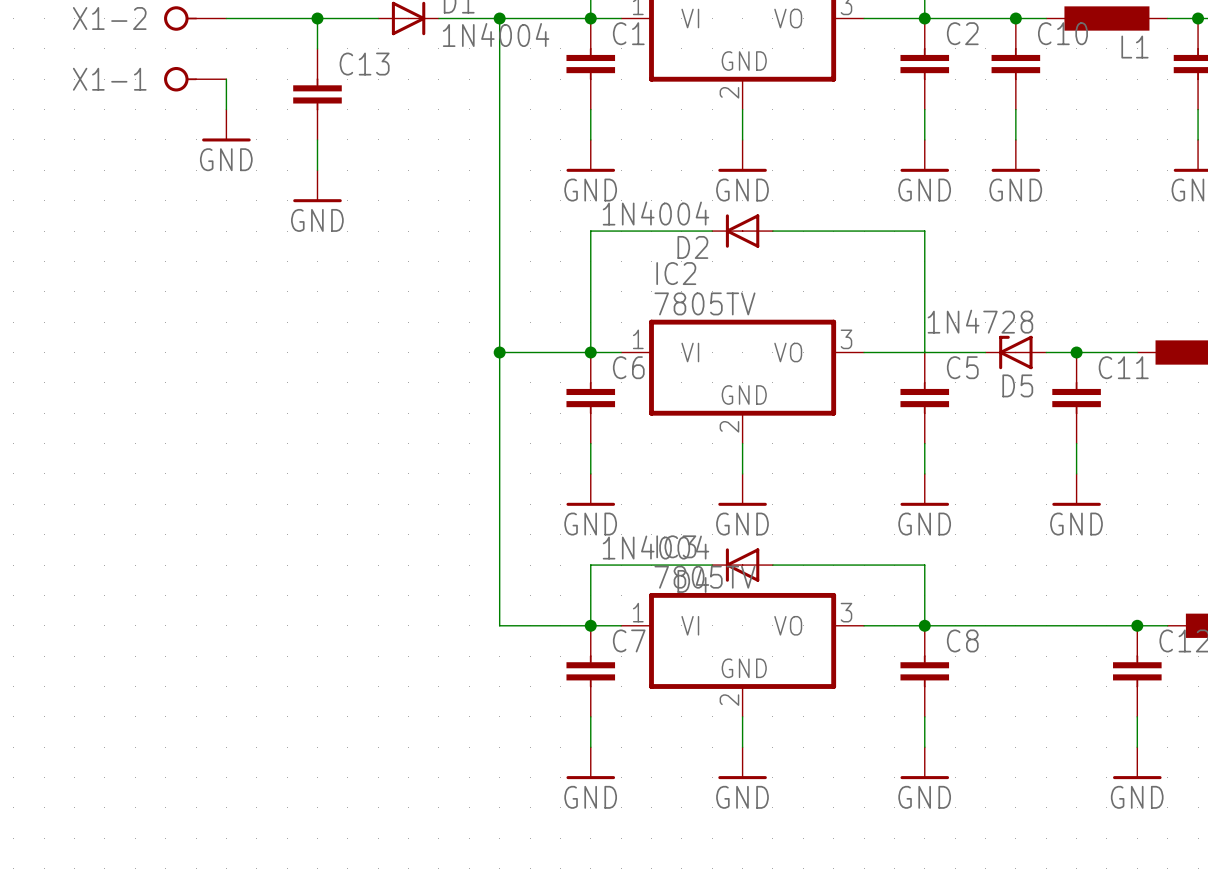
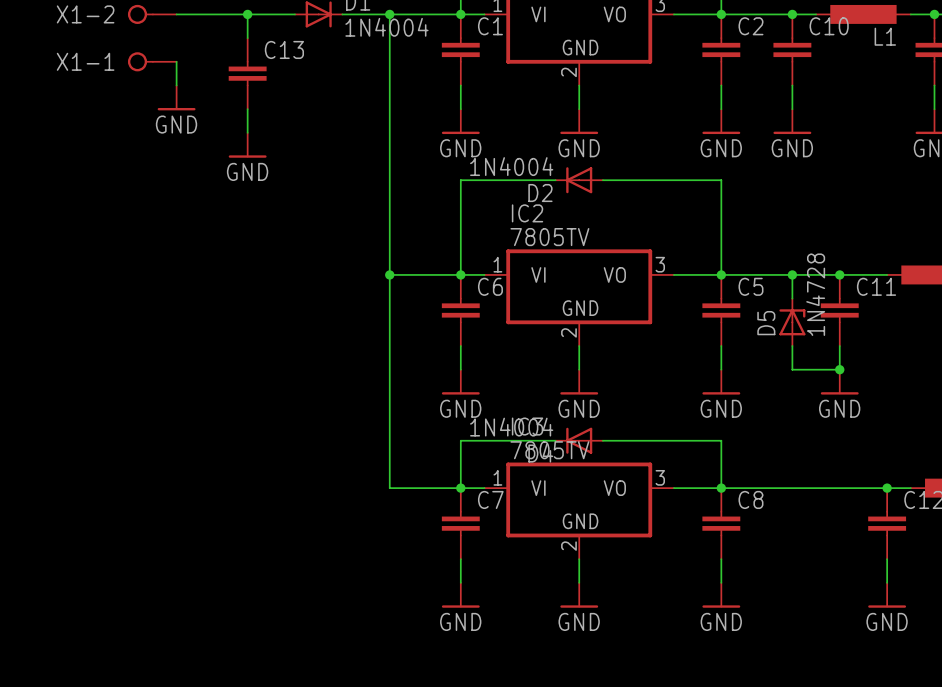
junction: none -> (721, 274)
wire: none -> (792, 274) (792, 298)
D5 rotation: 0° (1015, 352) -> 90° clockwise (792, 322)
D5 position: (1015, 352) -> (792, 322)
junction: none -> (792, 274)
wire: none -> (792, 346) (792, 369) (839, 369)
junction: none -> (839, 369)

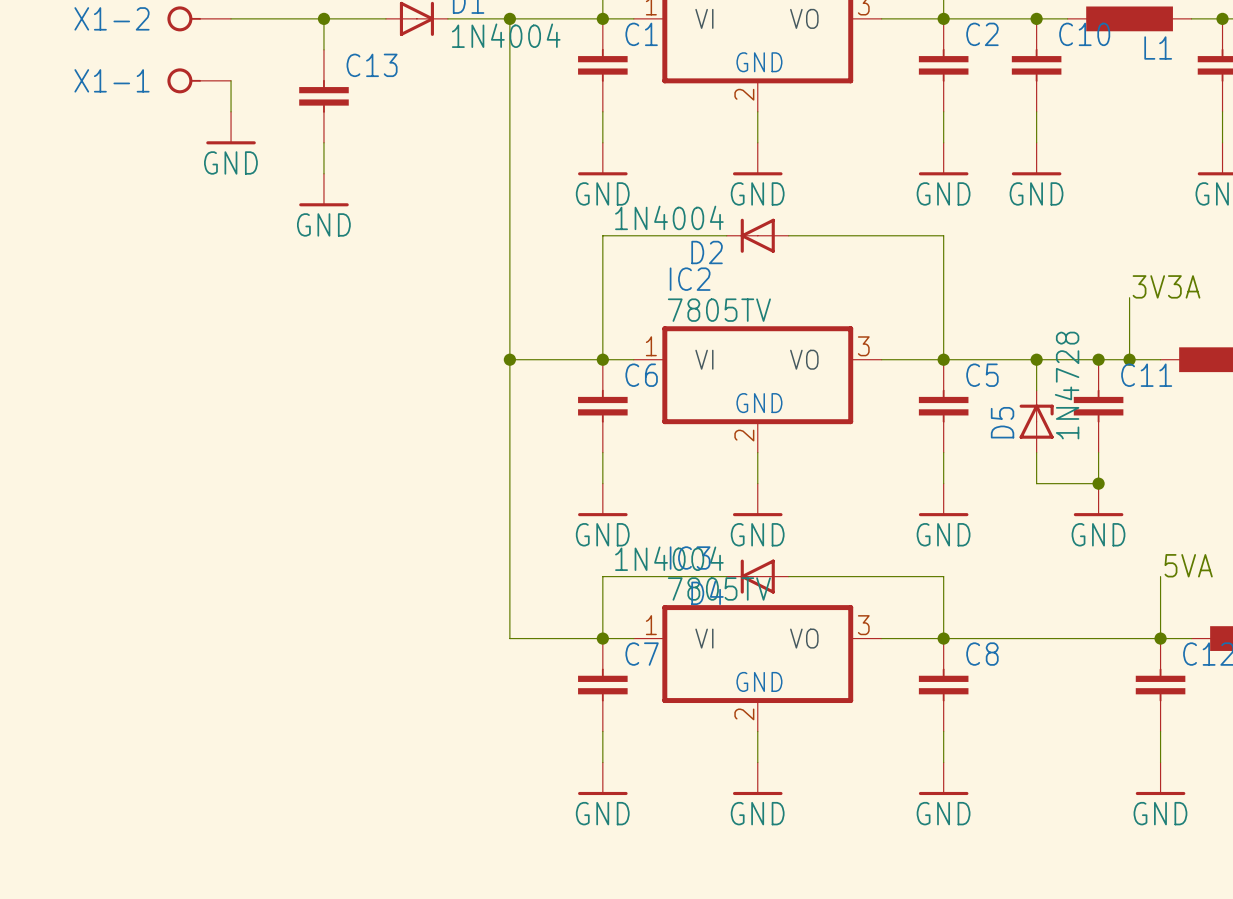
text: none -> 3V3A (1166, 286)
wire: none -> (1129, 297) (1129, 359)
junction: none -> (1129, 359)
text: none -> 5VA (1188, 565)
wire: none -> (1160, 576) (1160, 638)

